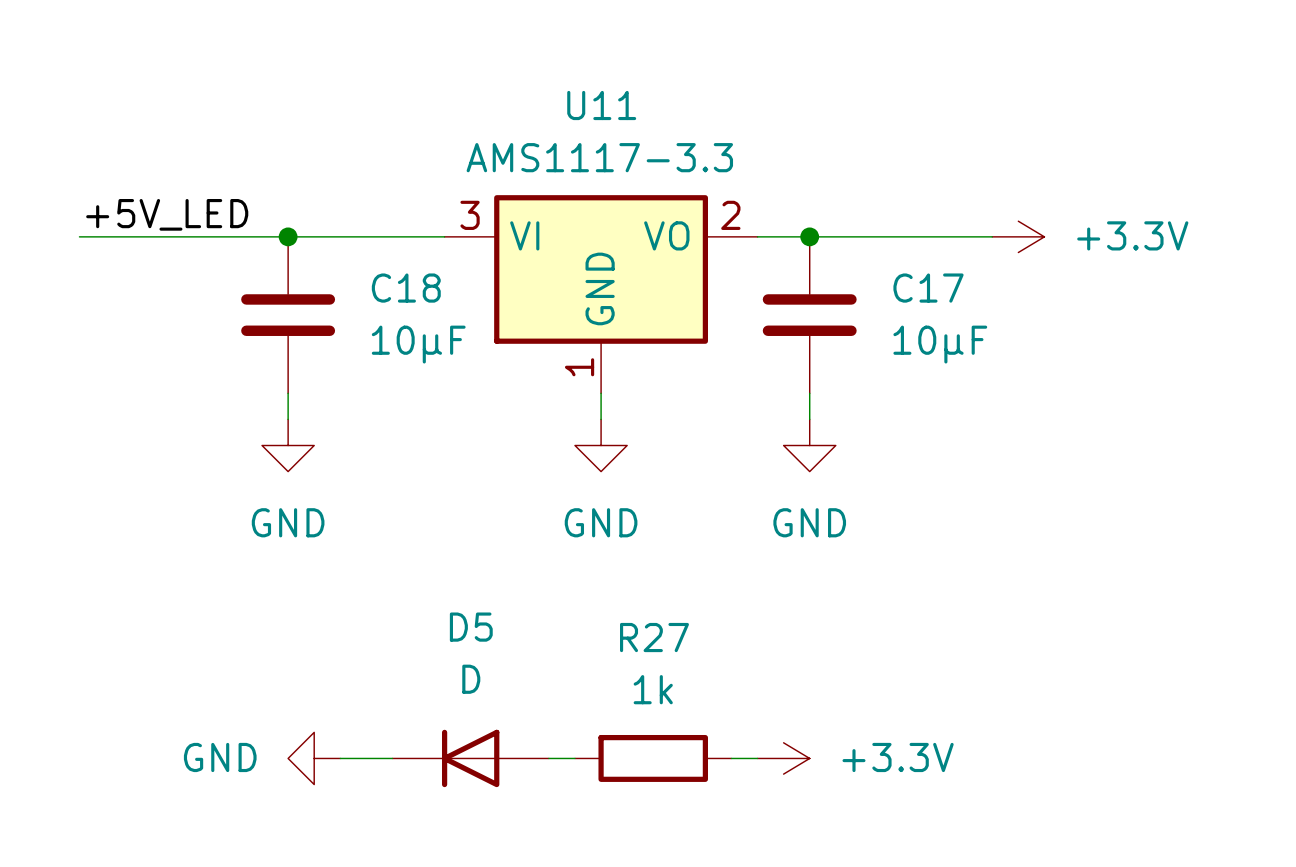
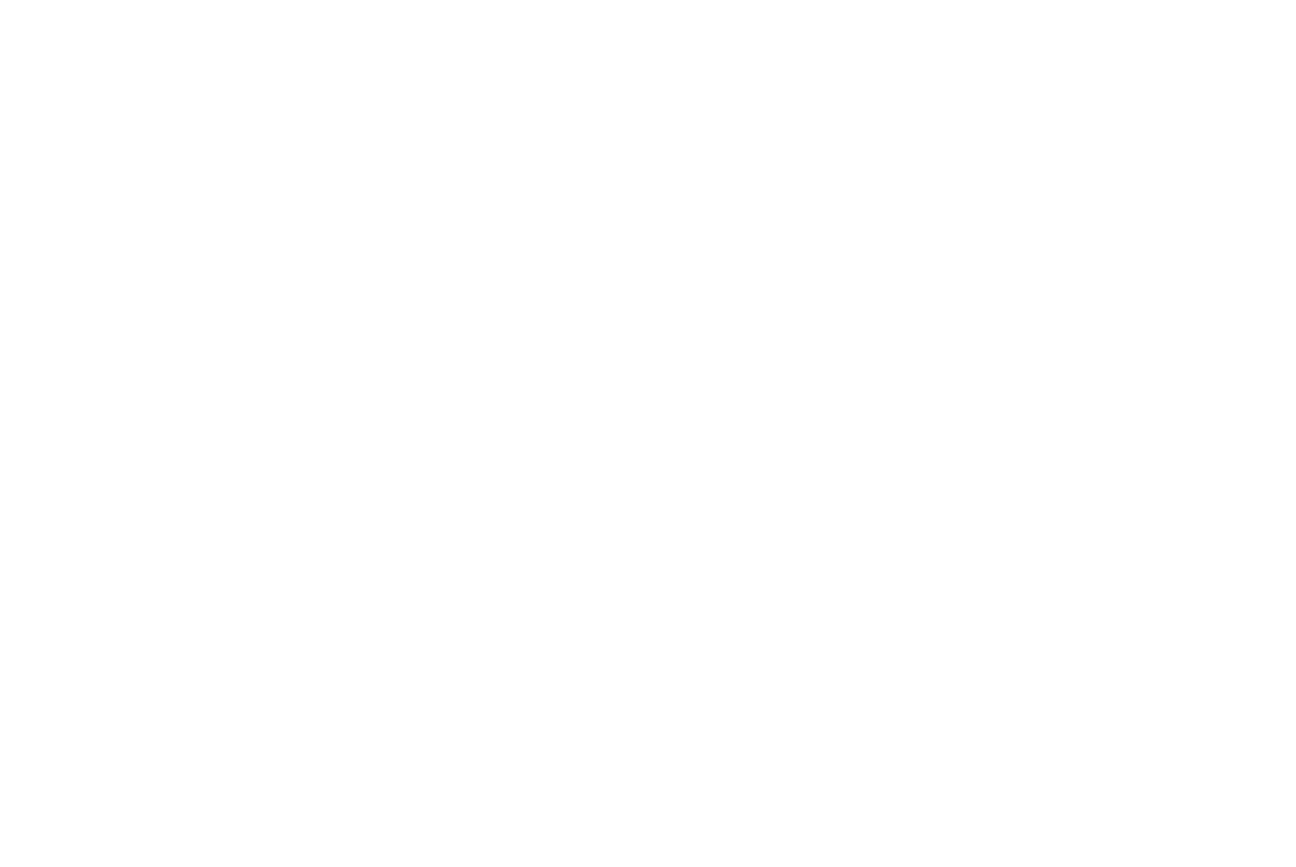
label: +5V_LED (167, 214) -> none
wire: (79, 236) (444, 236) -> none
junction: (288, 236) -> none
wire: (757, 236) (992, 236) -> none
junction: (809, 236) -> none
power symbol: +3.3V (1018, 236) -> none
U11: AMS1117-3.3 (601, 294) -> none
C18: 10µF (288, 315) -> none
C17: 10µF (809, 315) -> none
wire: (288, 393) (288, 419) -> none
wire: (601, 393) (601, 419) -> none
wire: (809, 393) (809, 419) -> none
power symbol: GND (288, 445) -> none
power symbol: GND (601, 445) -> none
power symbol: GND (809, 445) -> none
power symbol: GND (314, 758) -> none
wire: (340, 758) (392, 758) -> none
D5: D (470, 758) -> none
wire: (548, 758) (574, 758) -> none
R27: 1k (653, 758) -> none
wire: (731, 758) (757, 758) -> none
power symbol: +3.3V (783, 758) -> none

